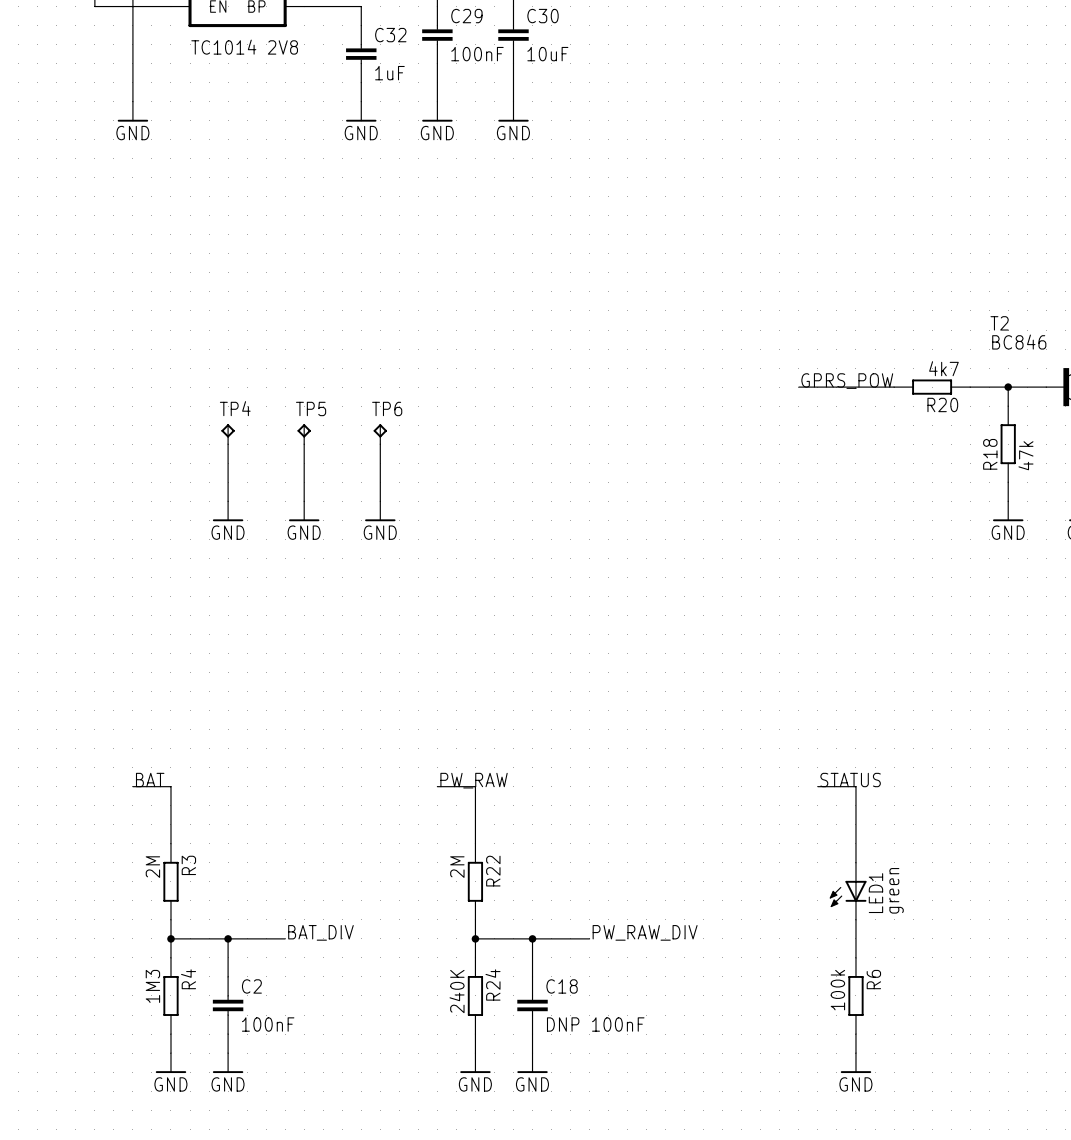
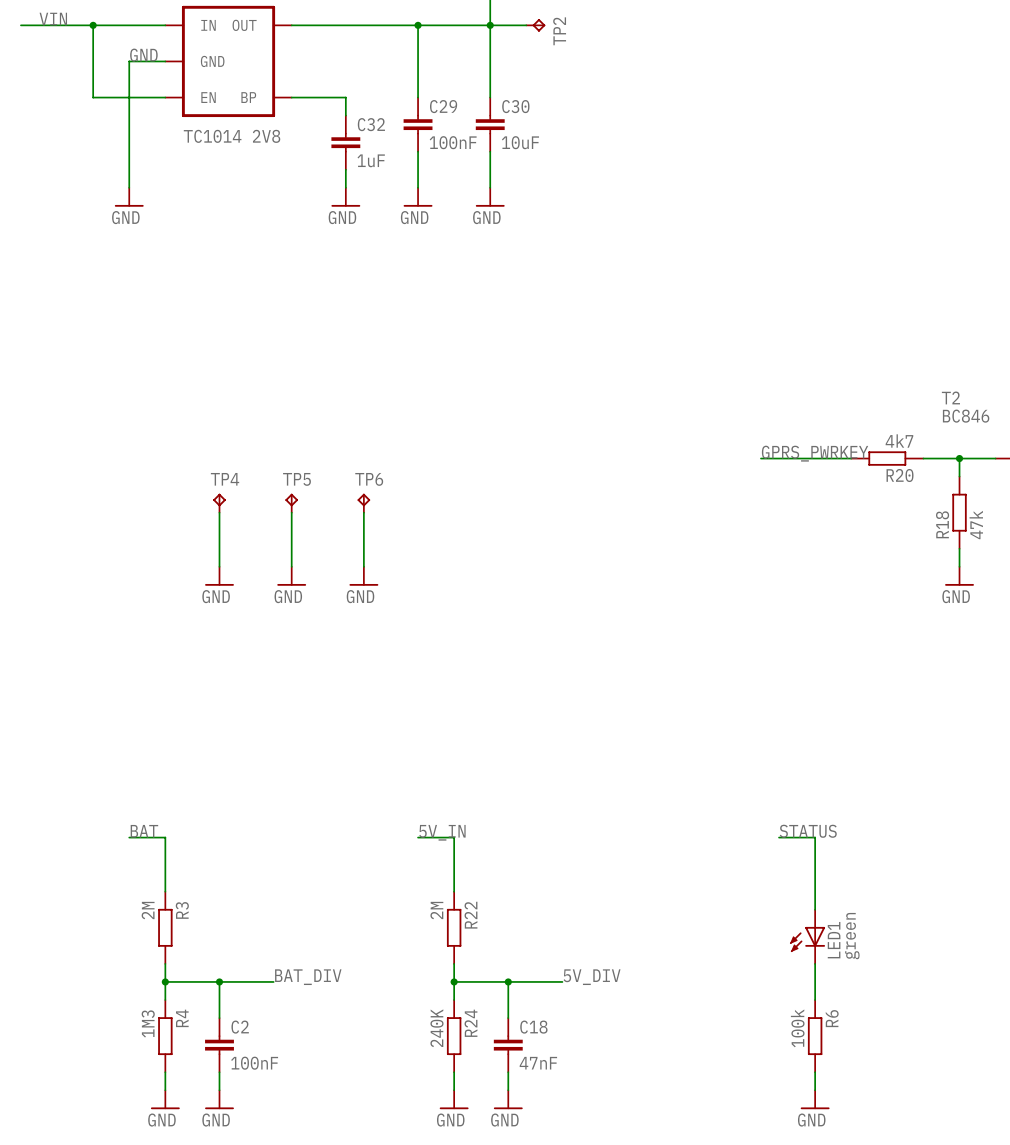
label: GPRS_POW (847, 381) -> GPRS_PWRKEY (815, 453)
label: PW_RAW (474, 780) -> 5V_IN (442, 832)
label: PW_RAW_DIV (645, 932) -> 5V_DIV (592, 977)
C18 value: DNP 100nF (595, 1024) -> 47nF (538, 1063)

